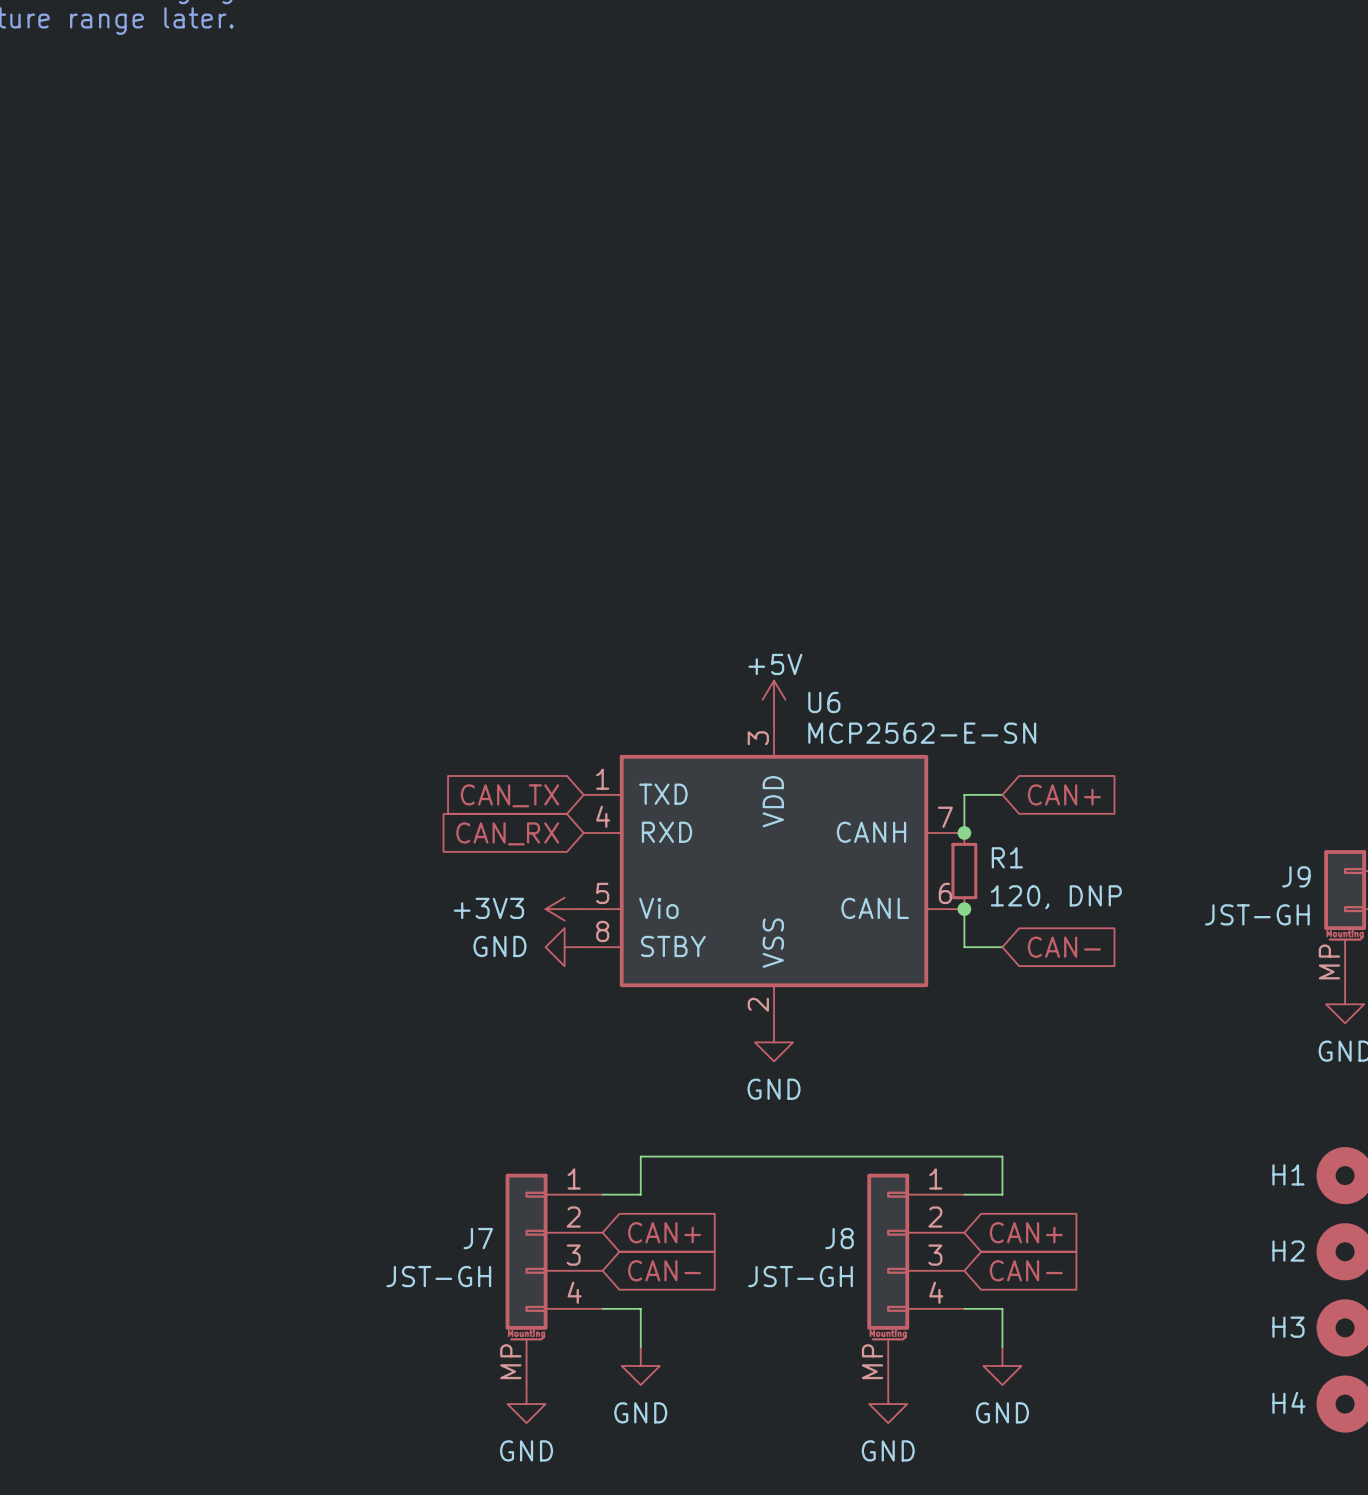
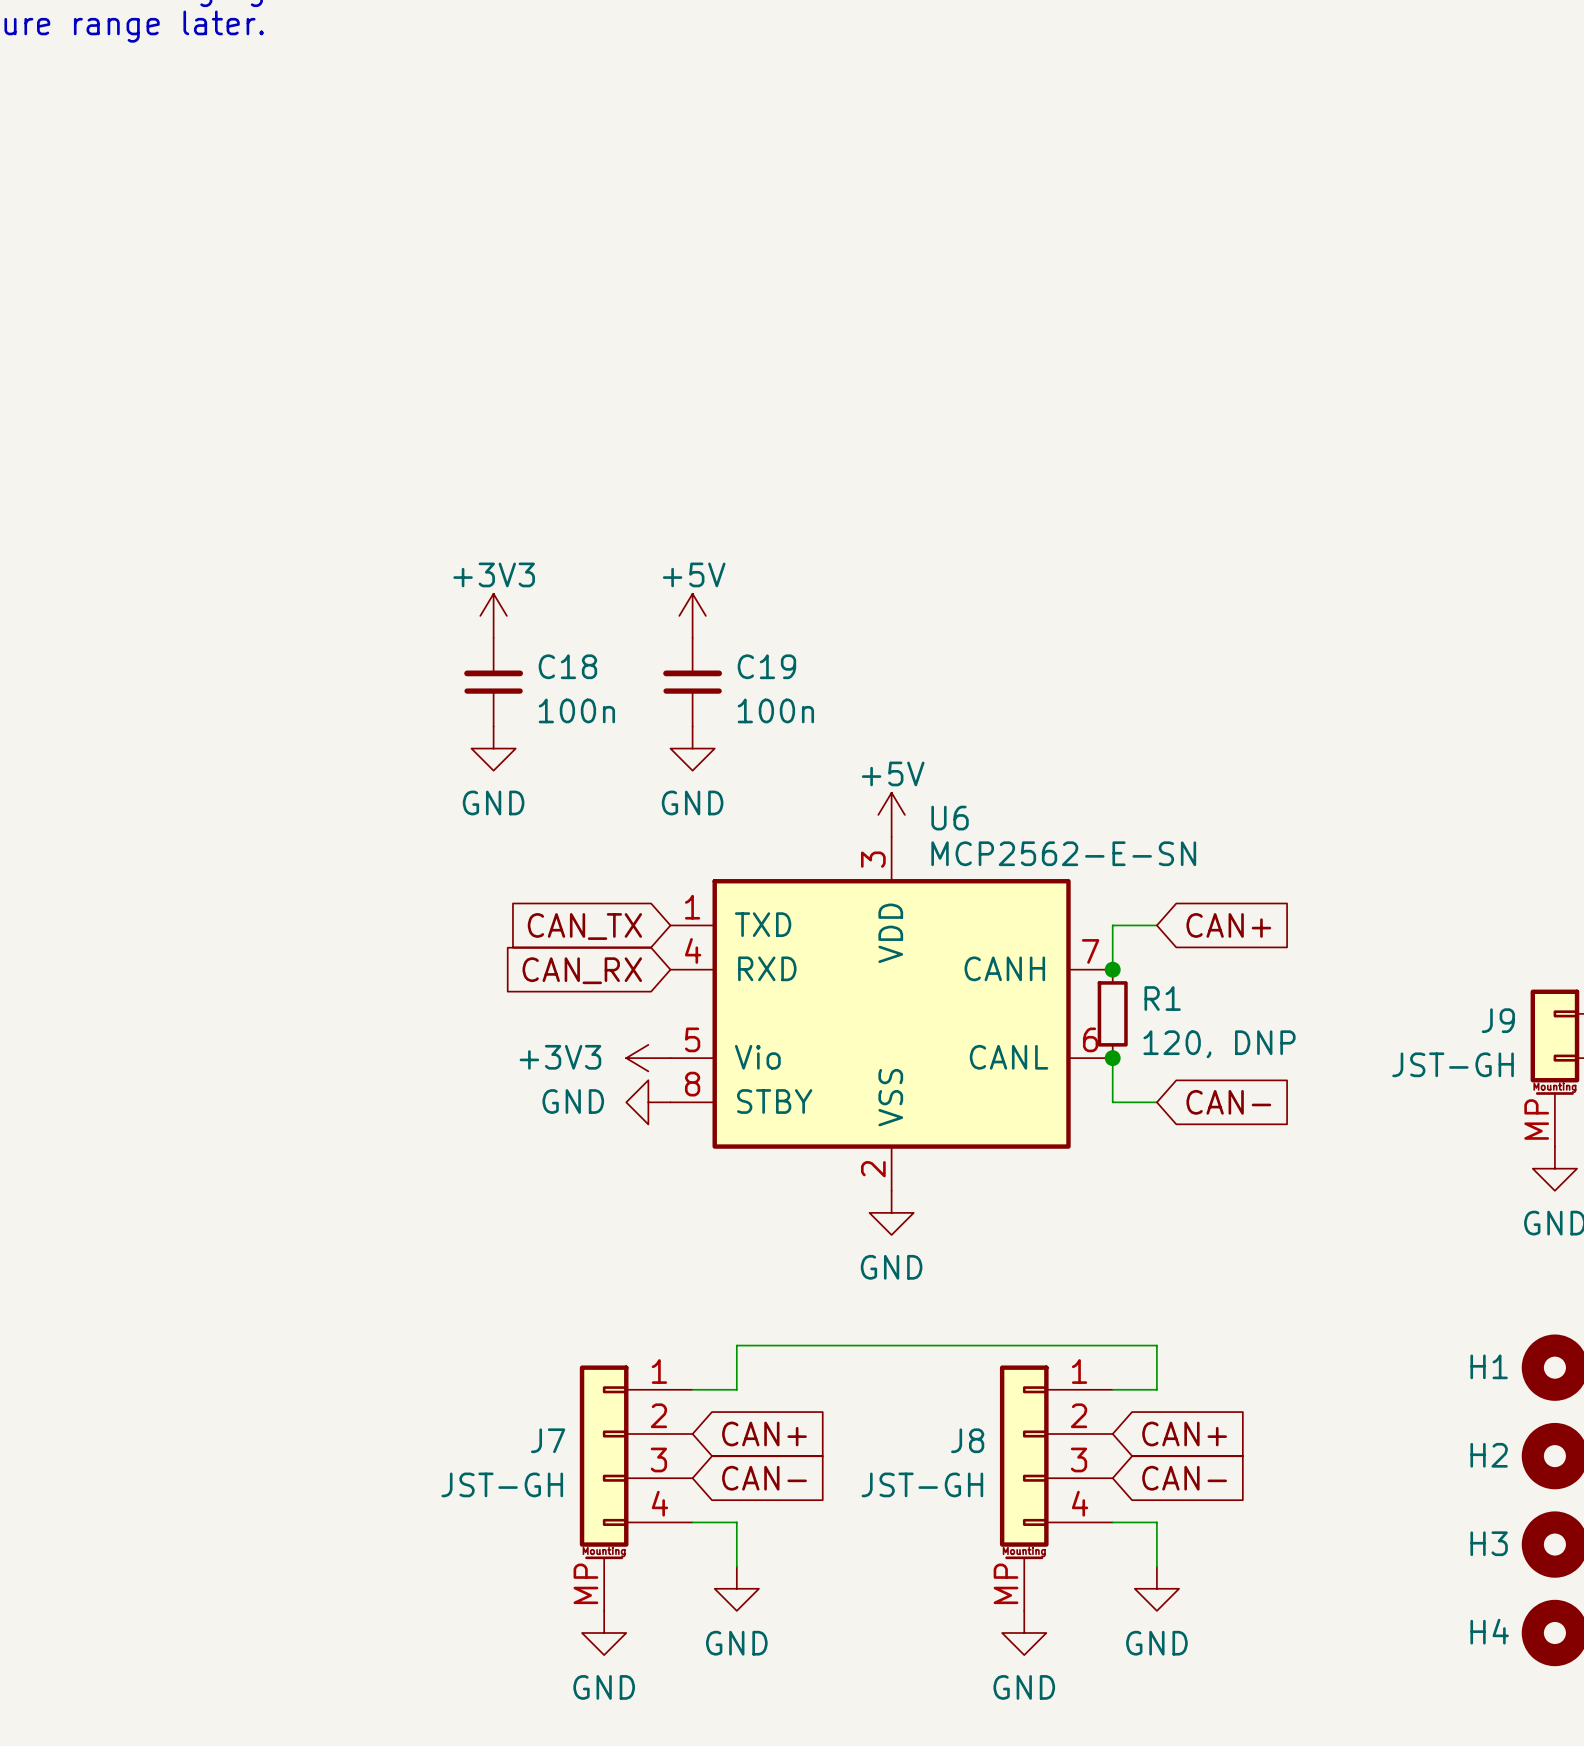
power symbol: none -> +3V3 (493, 615)
power symbol: none -> +5V (692, 615)
C18: none -> 100n (493, 682)
C19: none -> 100n (692, 682)
power symbol: none -> GND (493, 748)
power symbol: none -> GND (692, 748)

